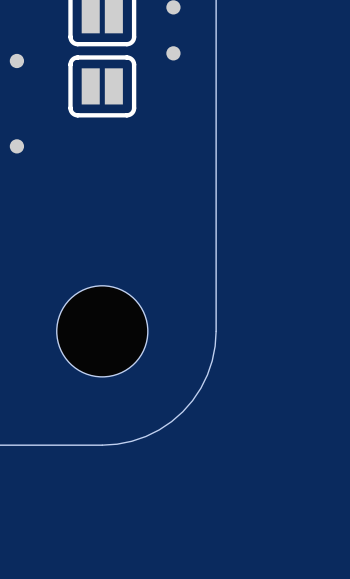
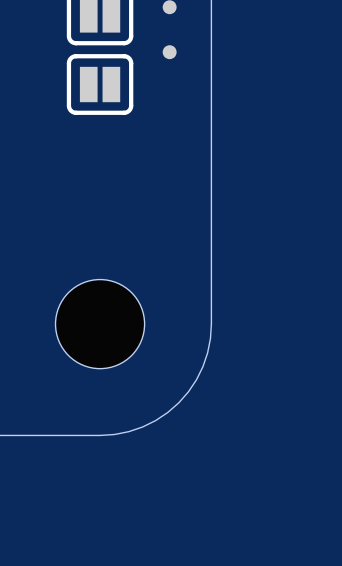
part: (16, 60) -> none
part: (16, 146) -> none

